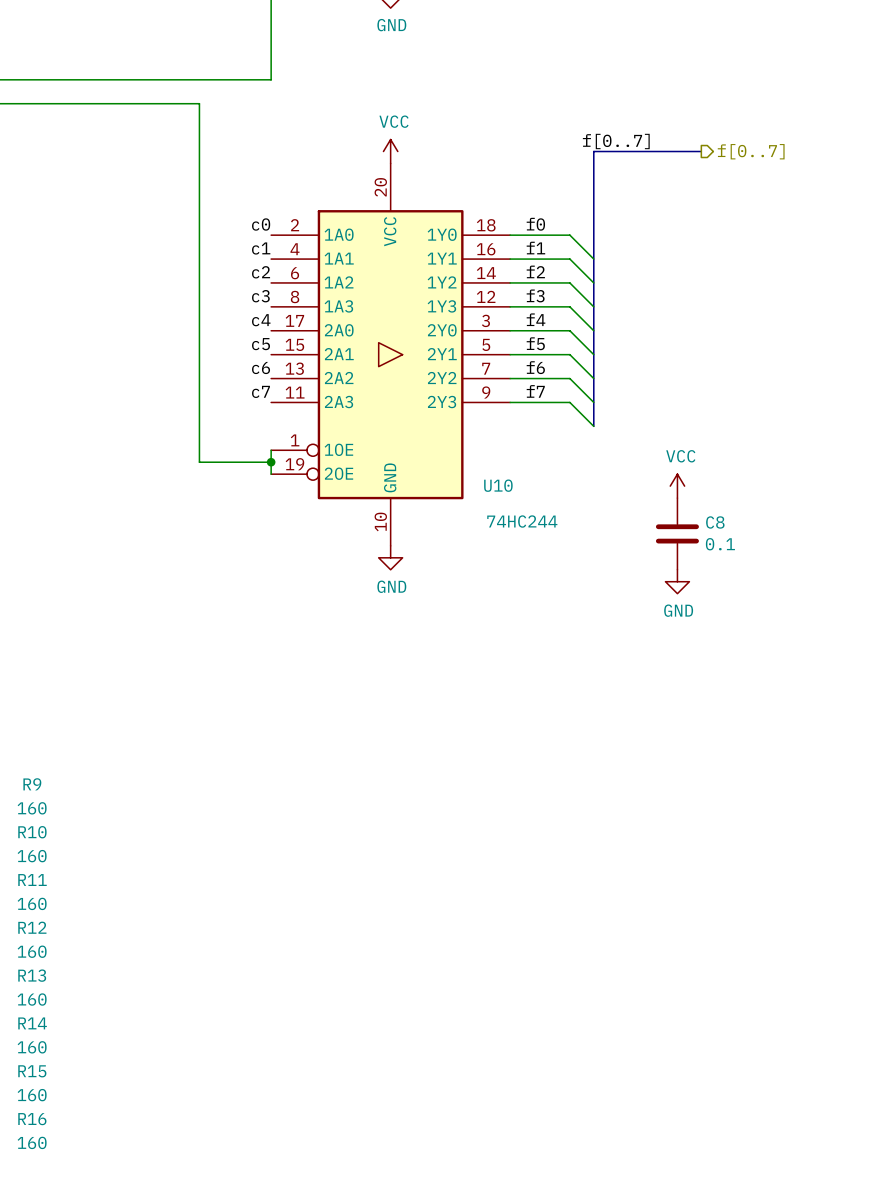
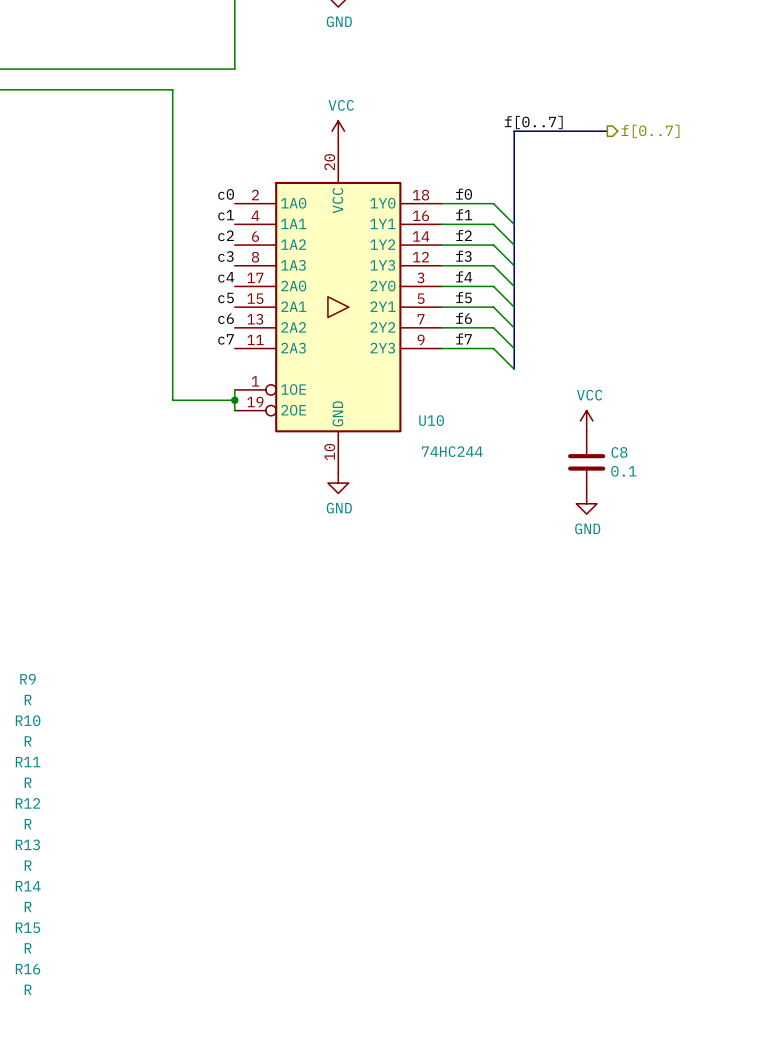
R9 value: 160 (32, 808) -> R (28, 700)
R10 value: 160 (32, 856) -> R (28, 741)
R11 value: 160 (32, 903) -> R (28, 782)
R12 value: 160 (32, 951) -> R (28, 824)
R13 value: 160 (32, 999) -> R (28, 865)
R14 value: 160 (32, 1047) -> R (28, 906)
R15 value: 160 (32, 1095) -> R (28, 948)
R16 value: 160 (32, 1142) -> R (28, 989)

